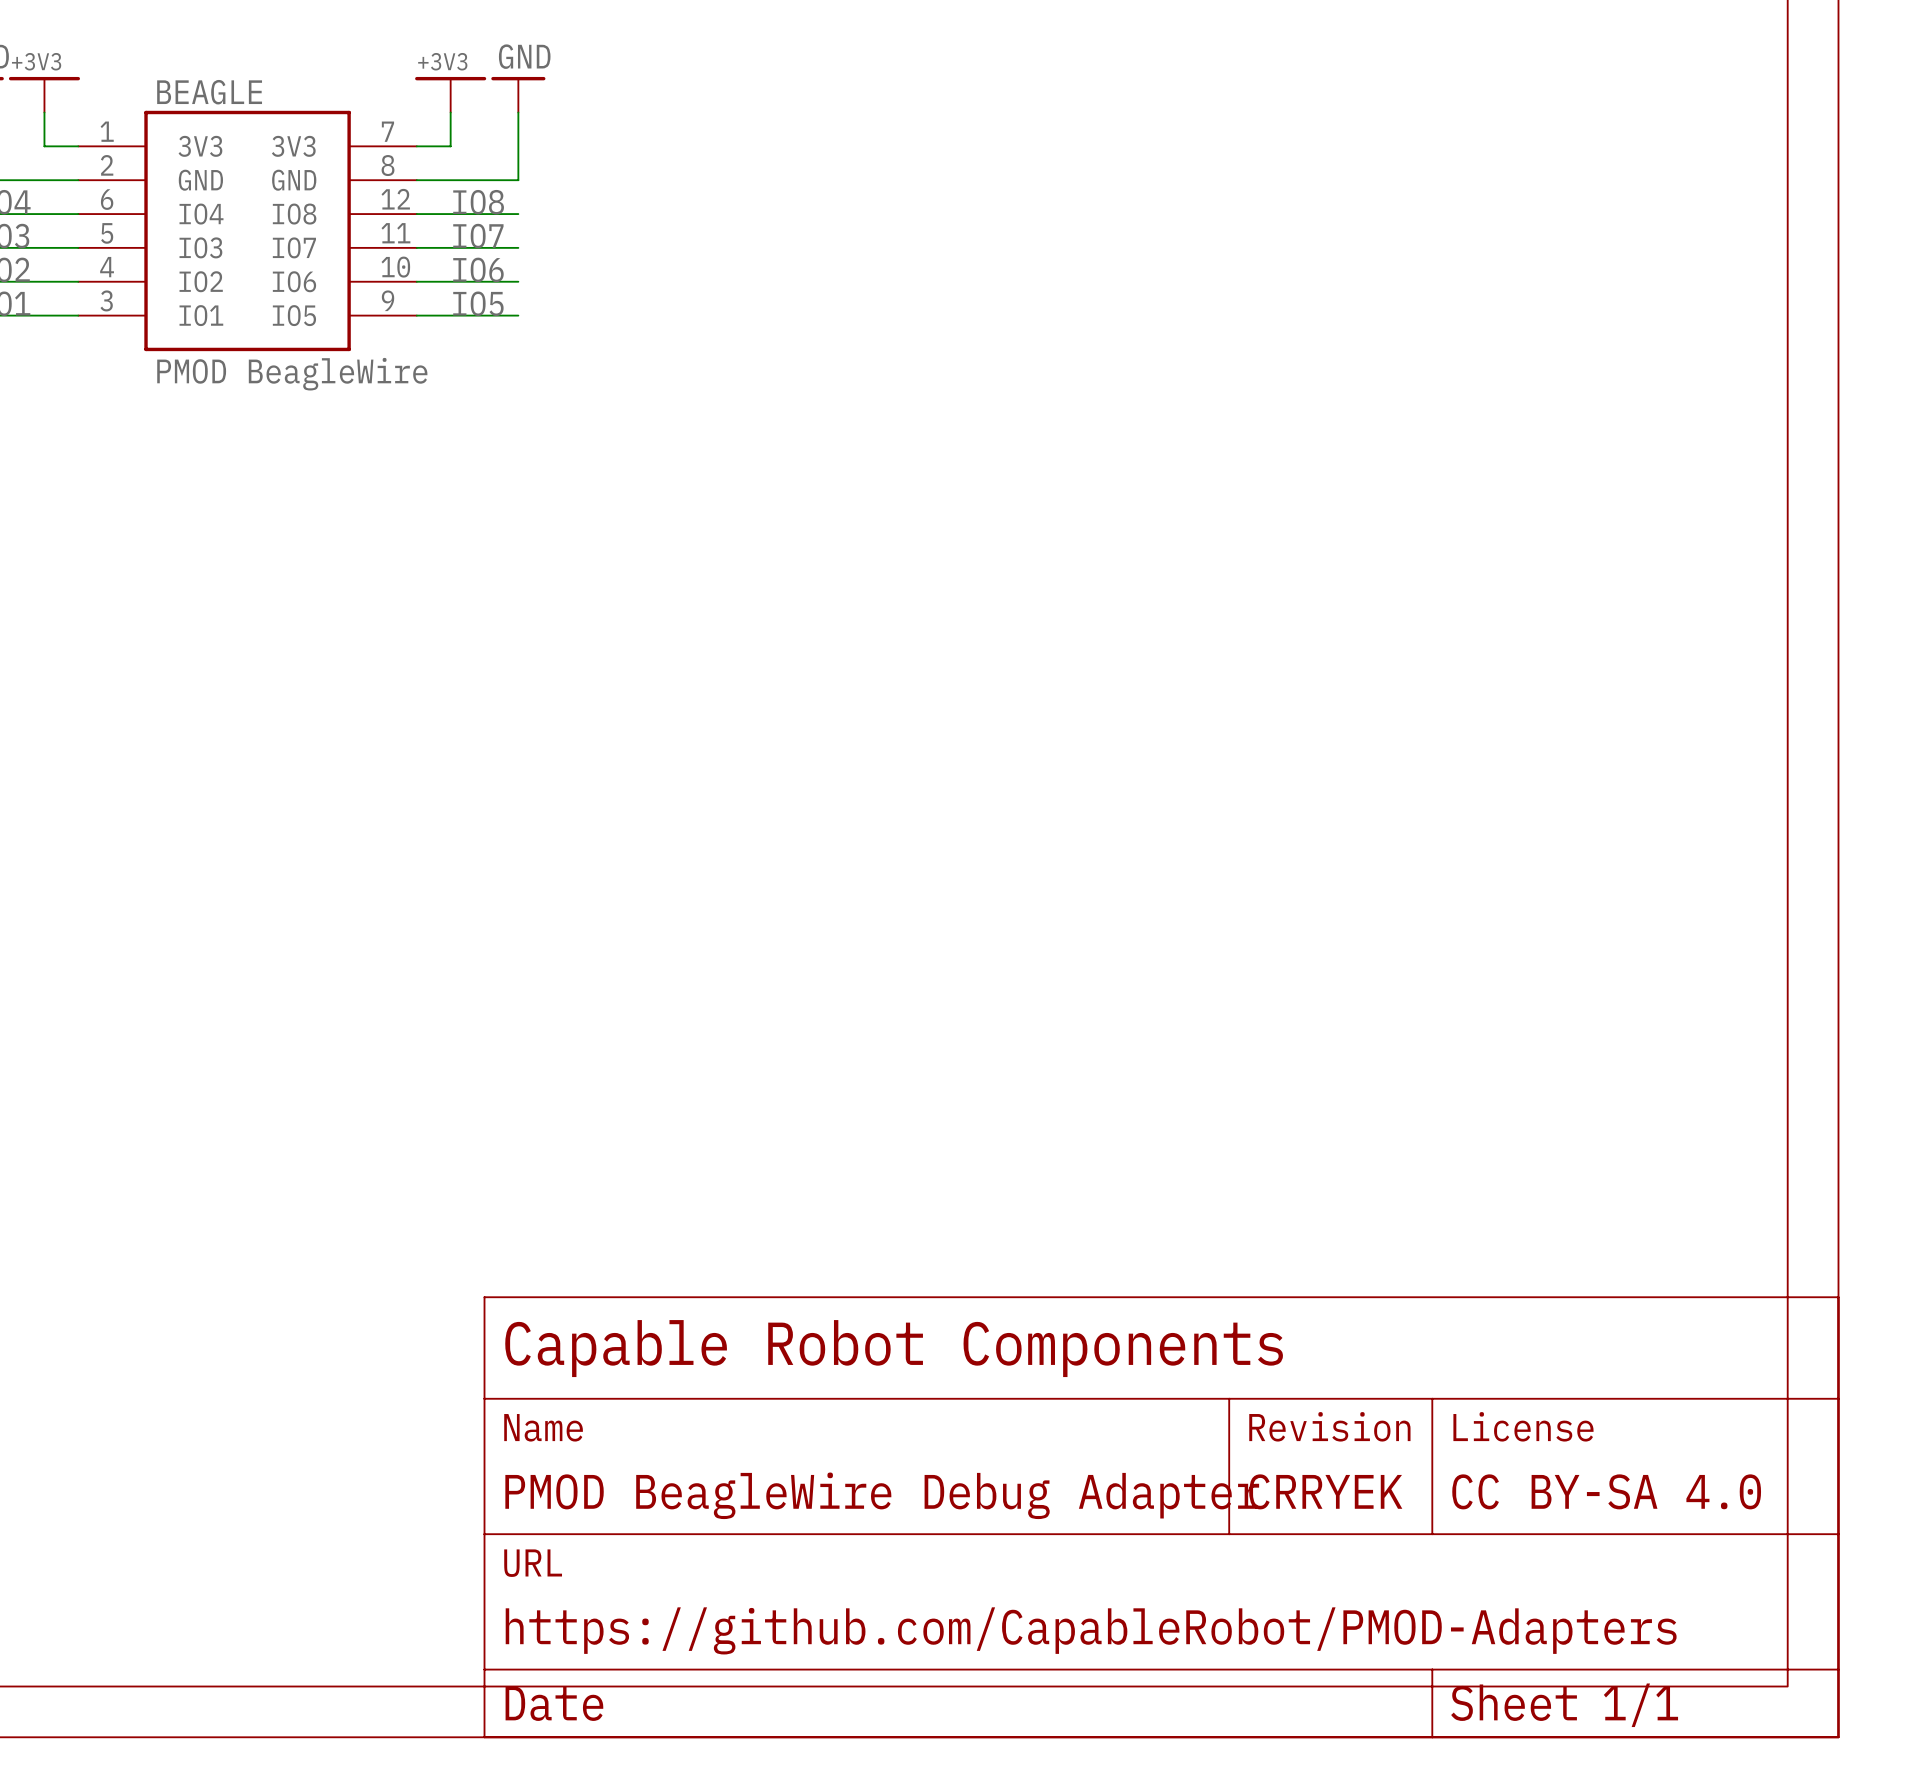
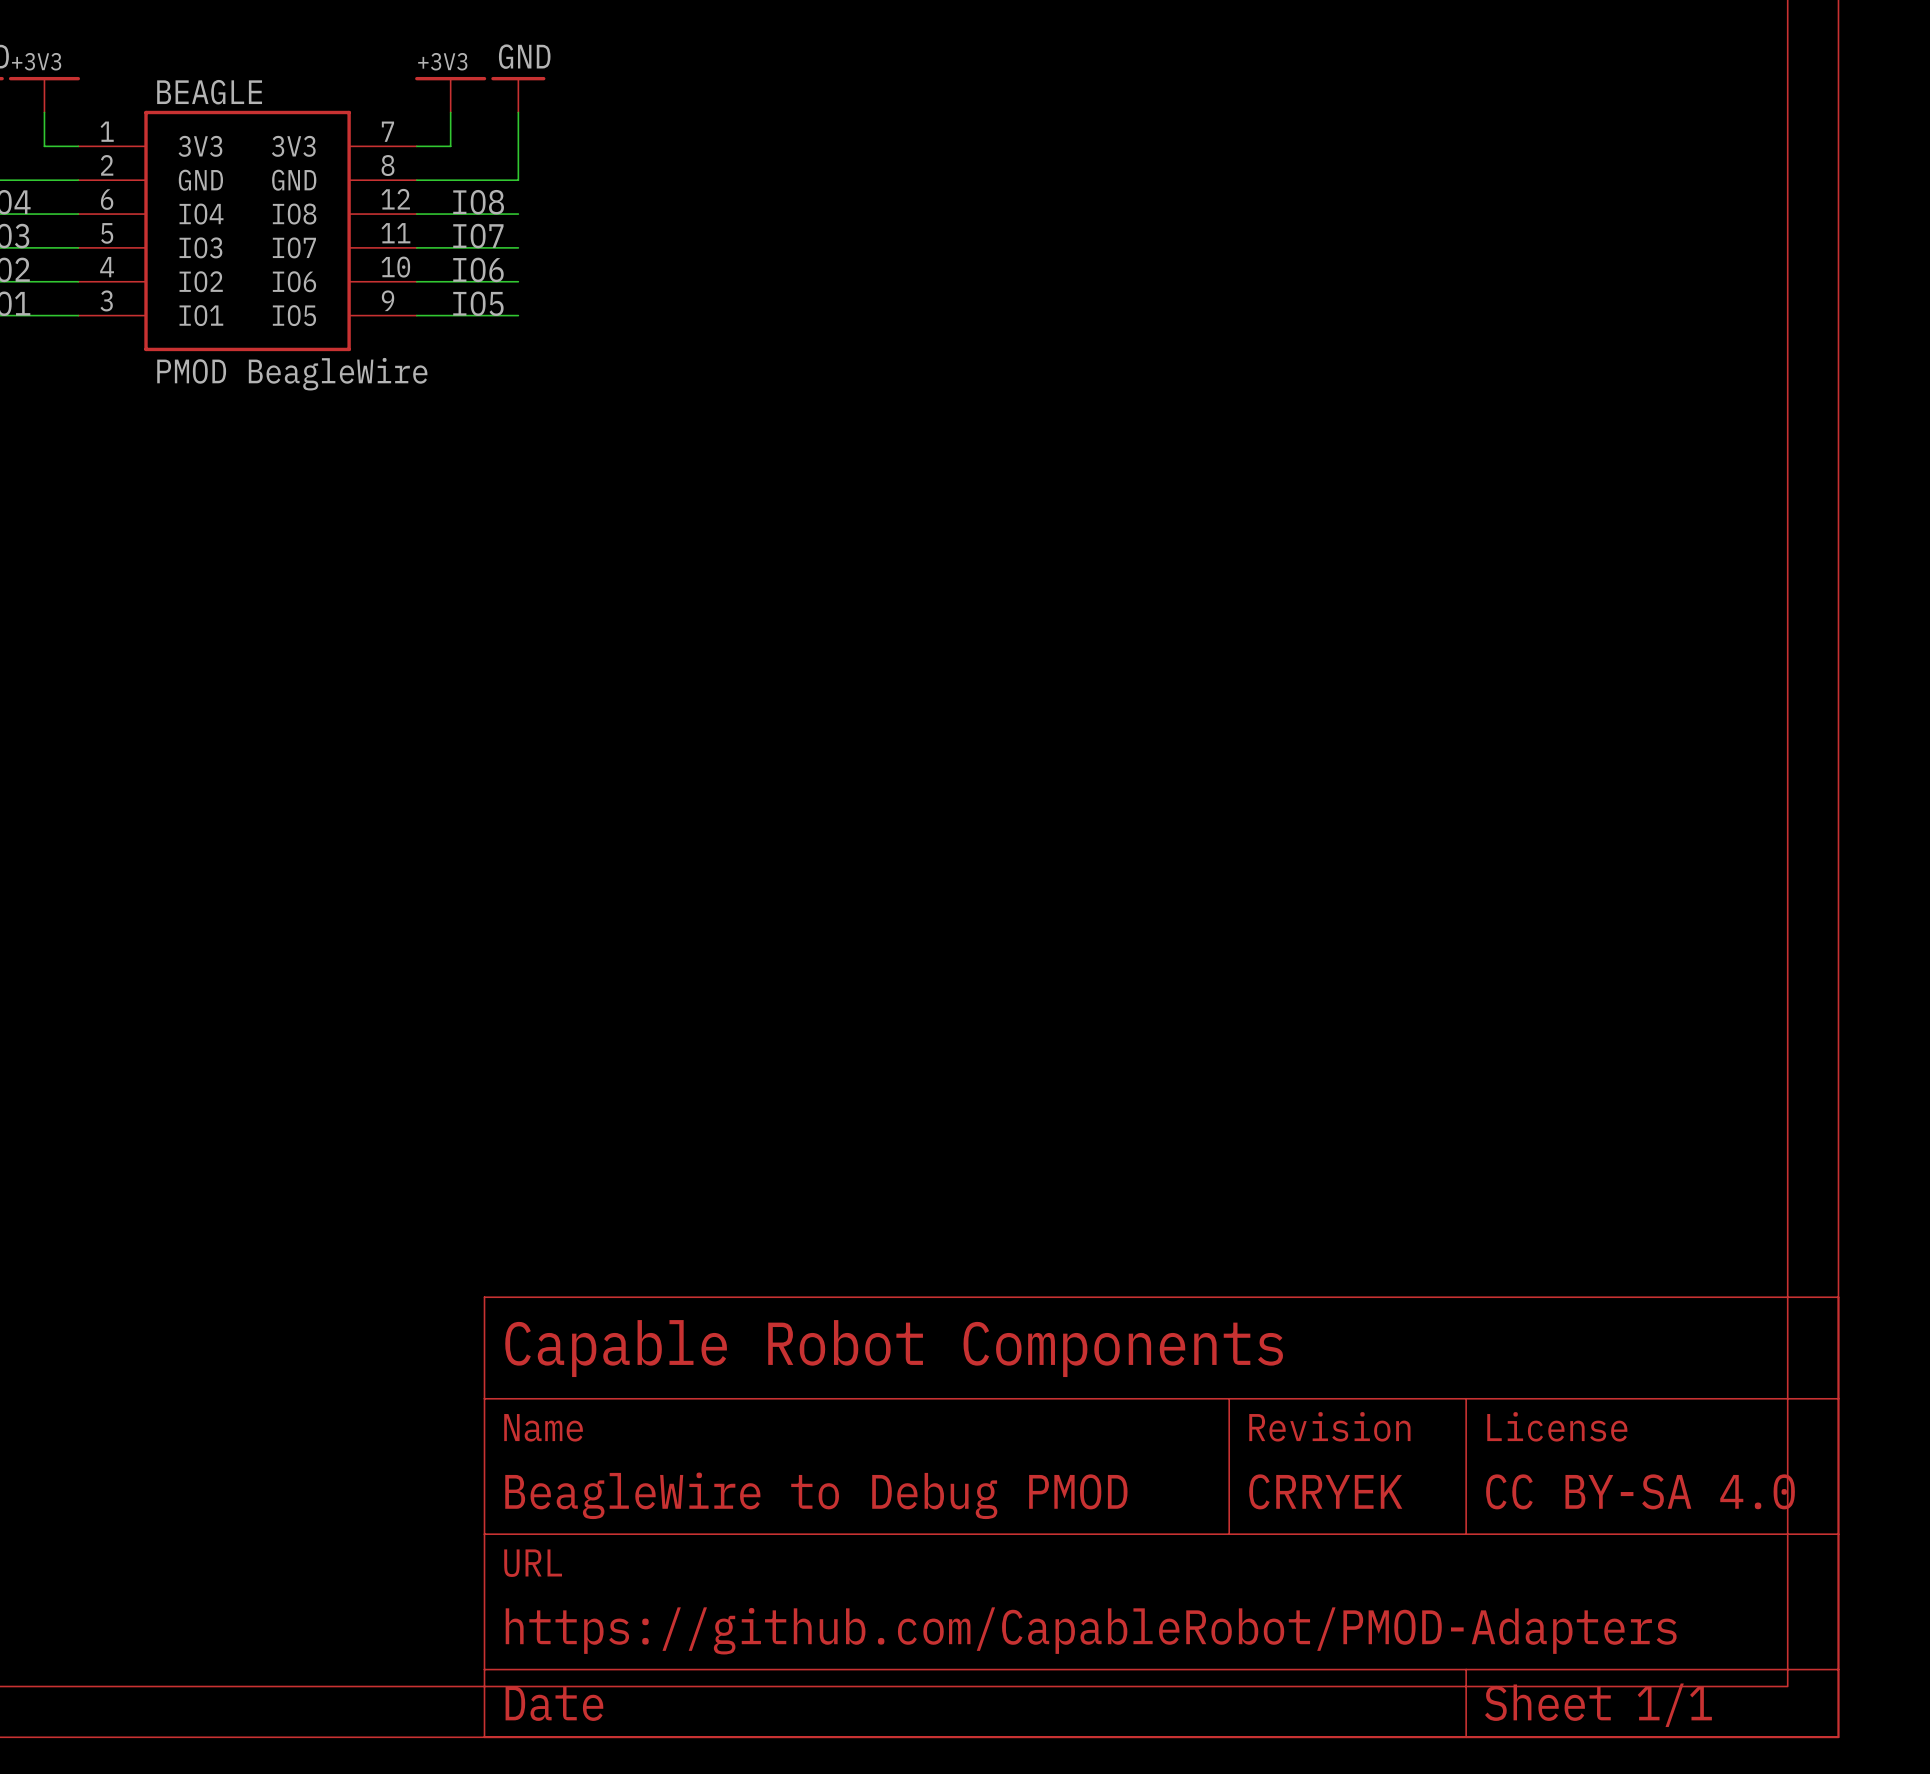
part symbol: [483, 1296, 1840, 1738] -> [483, 1296, 1840, 1738]
part text position: CC BY-SA 4.0 (1606, 1491) -> CC BY-SA 4.0 (1640, 1491)
part text: PMOD BeagleWire Debug Adapter (882, 1495) -> BeagleWire to Debug PMOD (816, 1495)
part text position: 1/1 (1640, 1705) -> 1/1 (1674, 1705)

